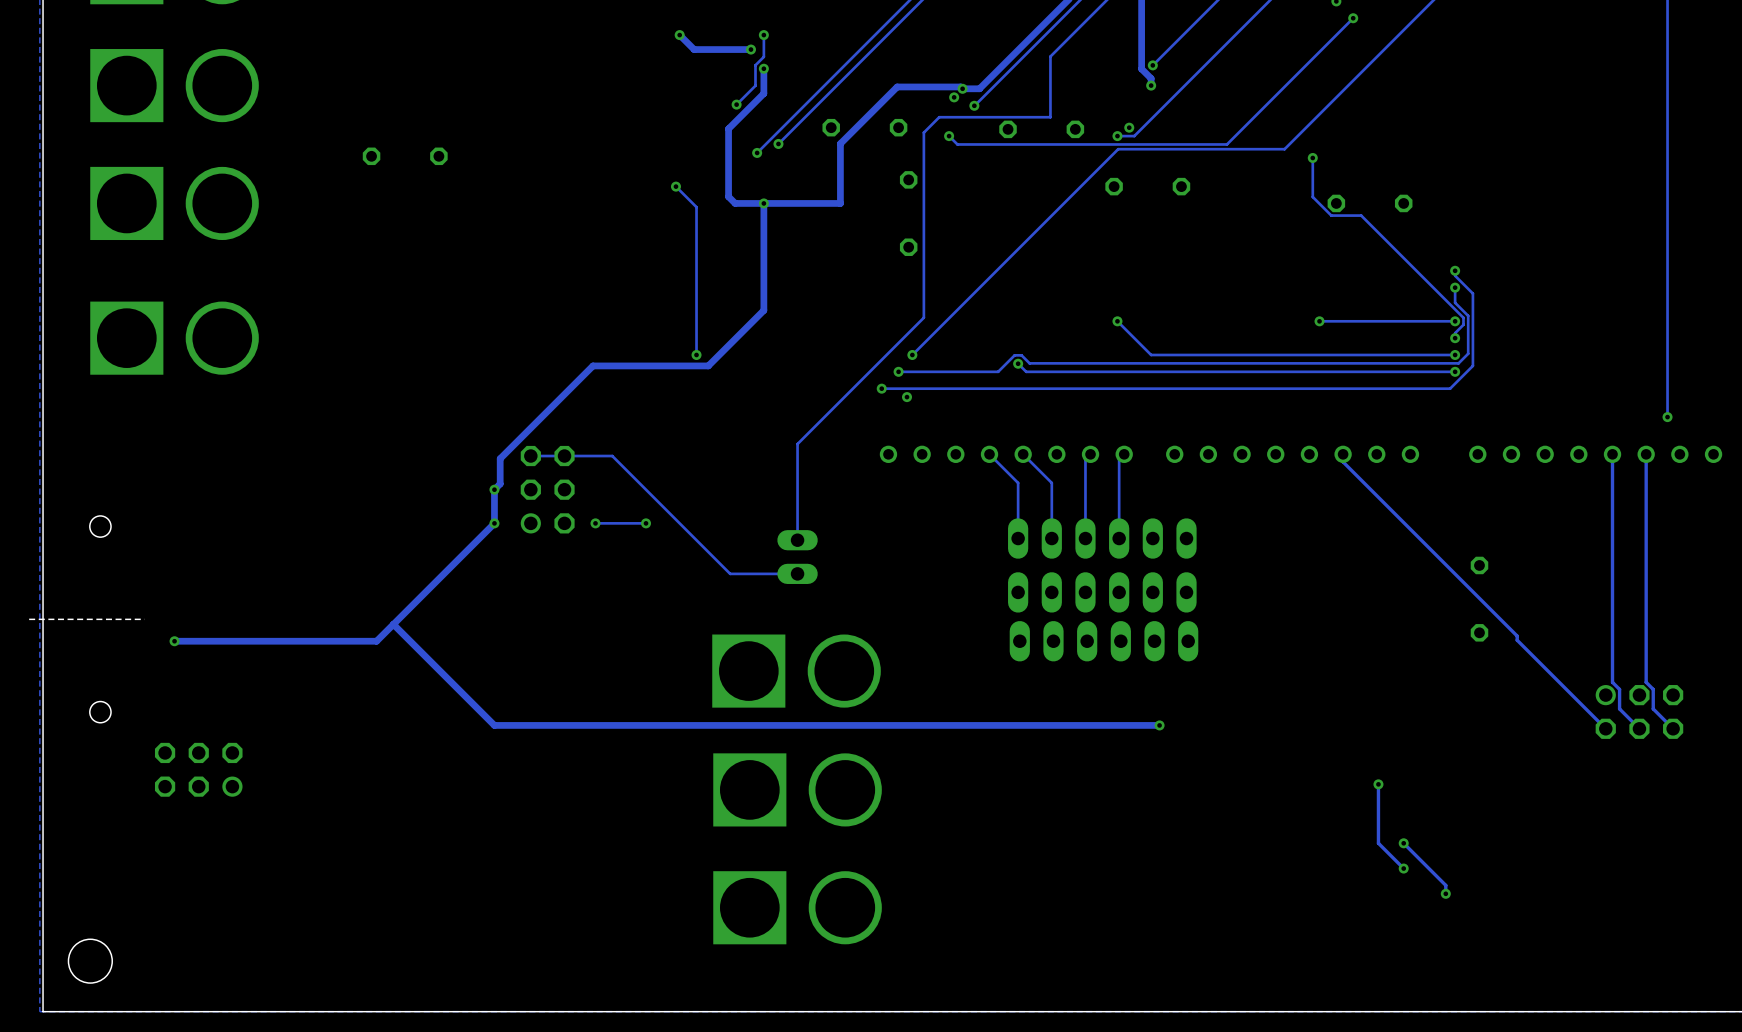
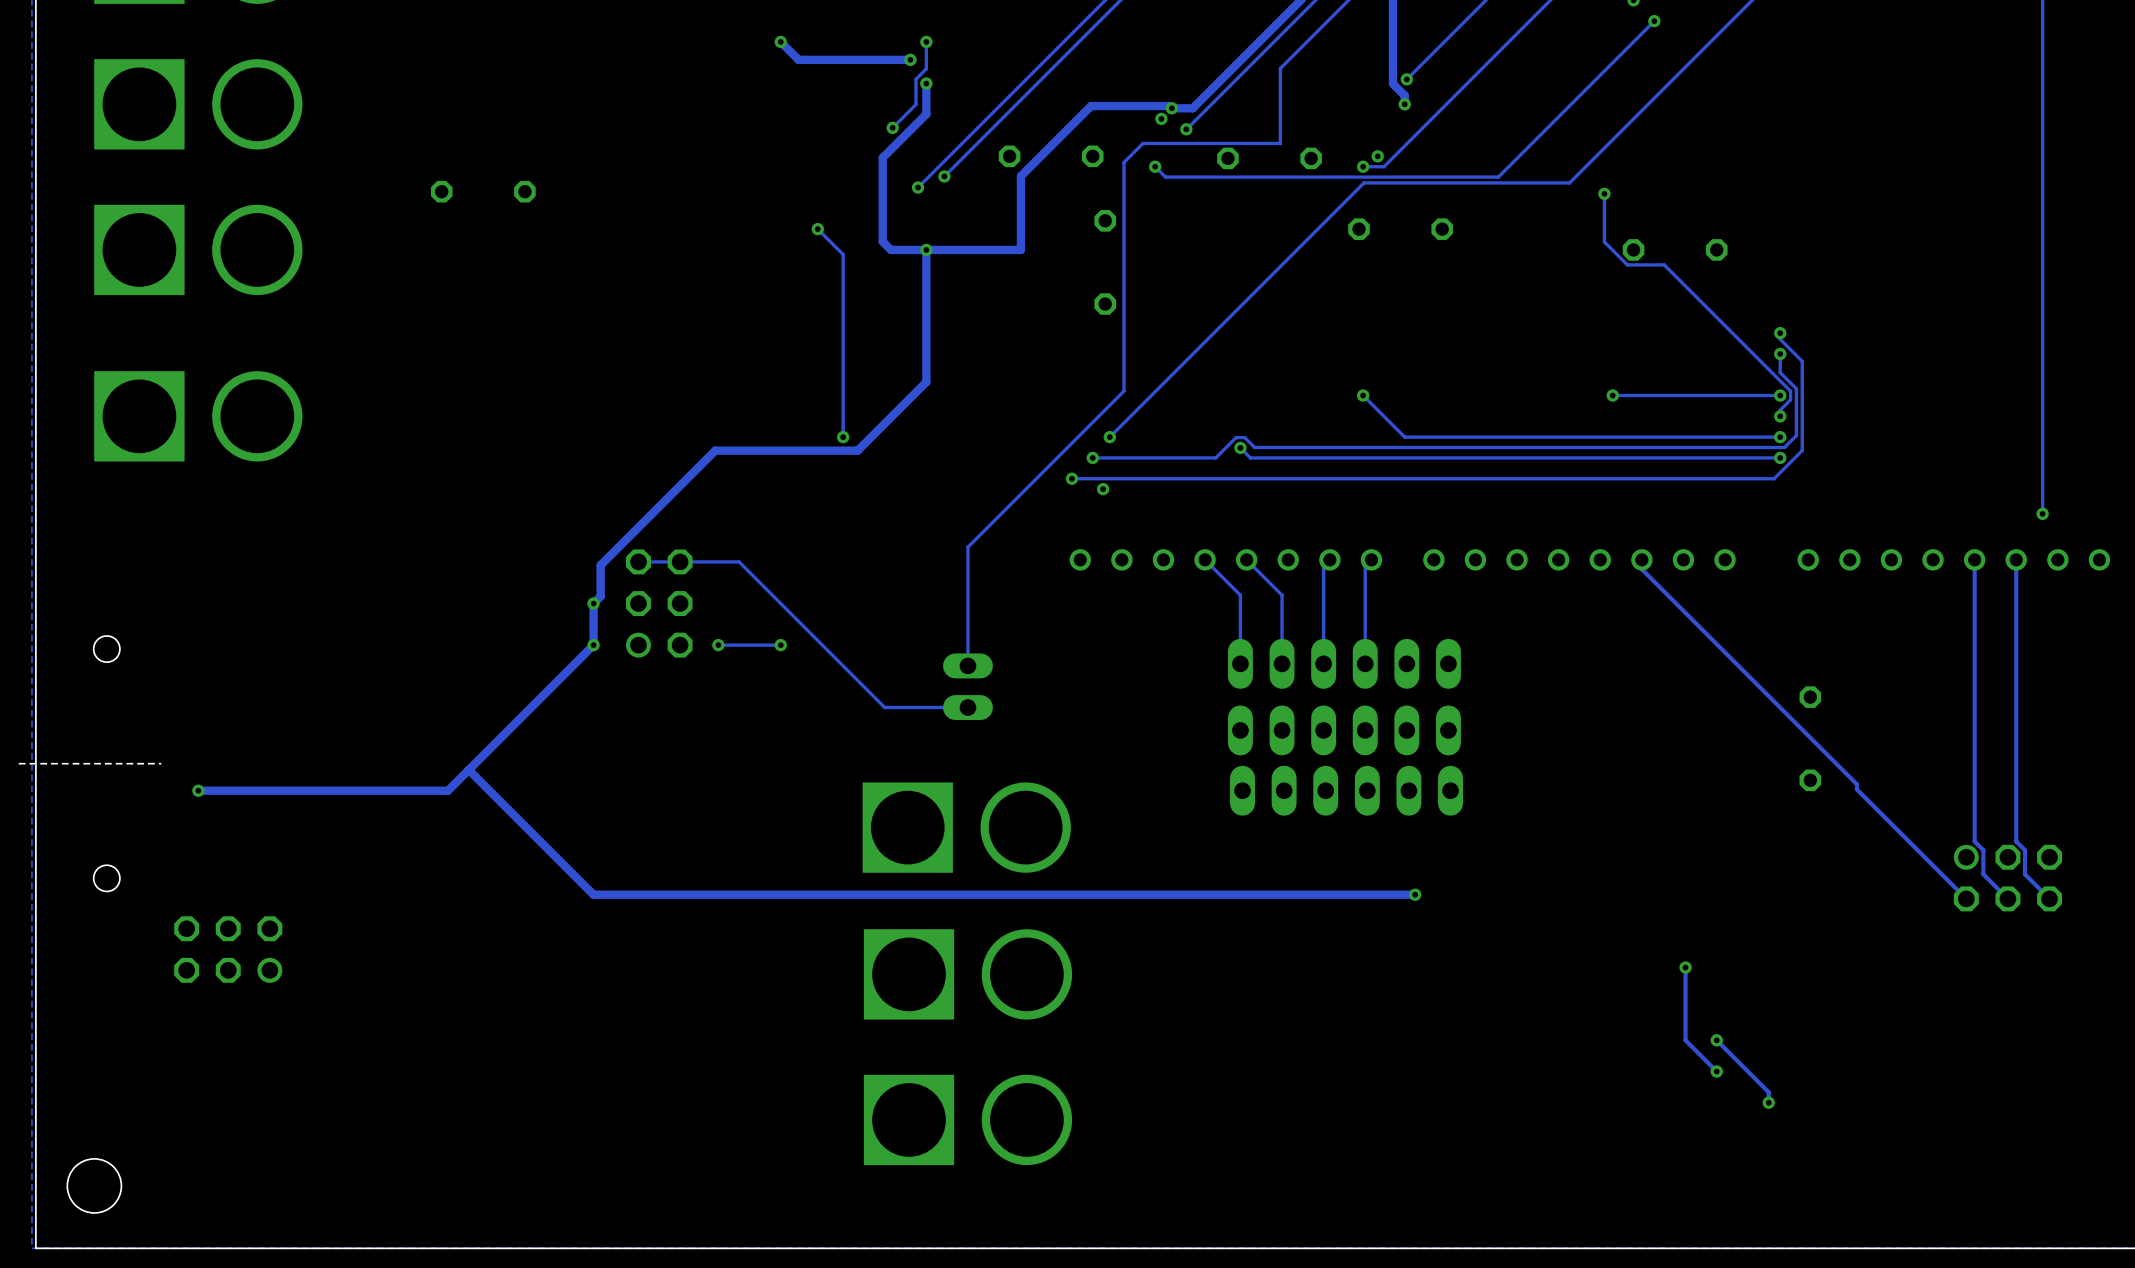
track: (679, 35) (694, 49) -> (780, 41) (798, 59) (840, 59)
via position: (679, 35) -> (780, 41)

